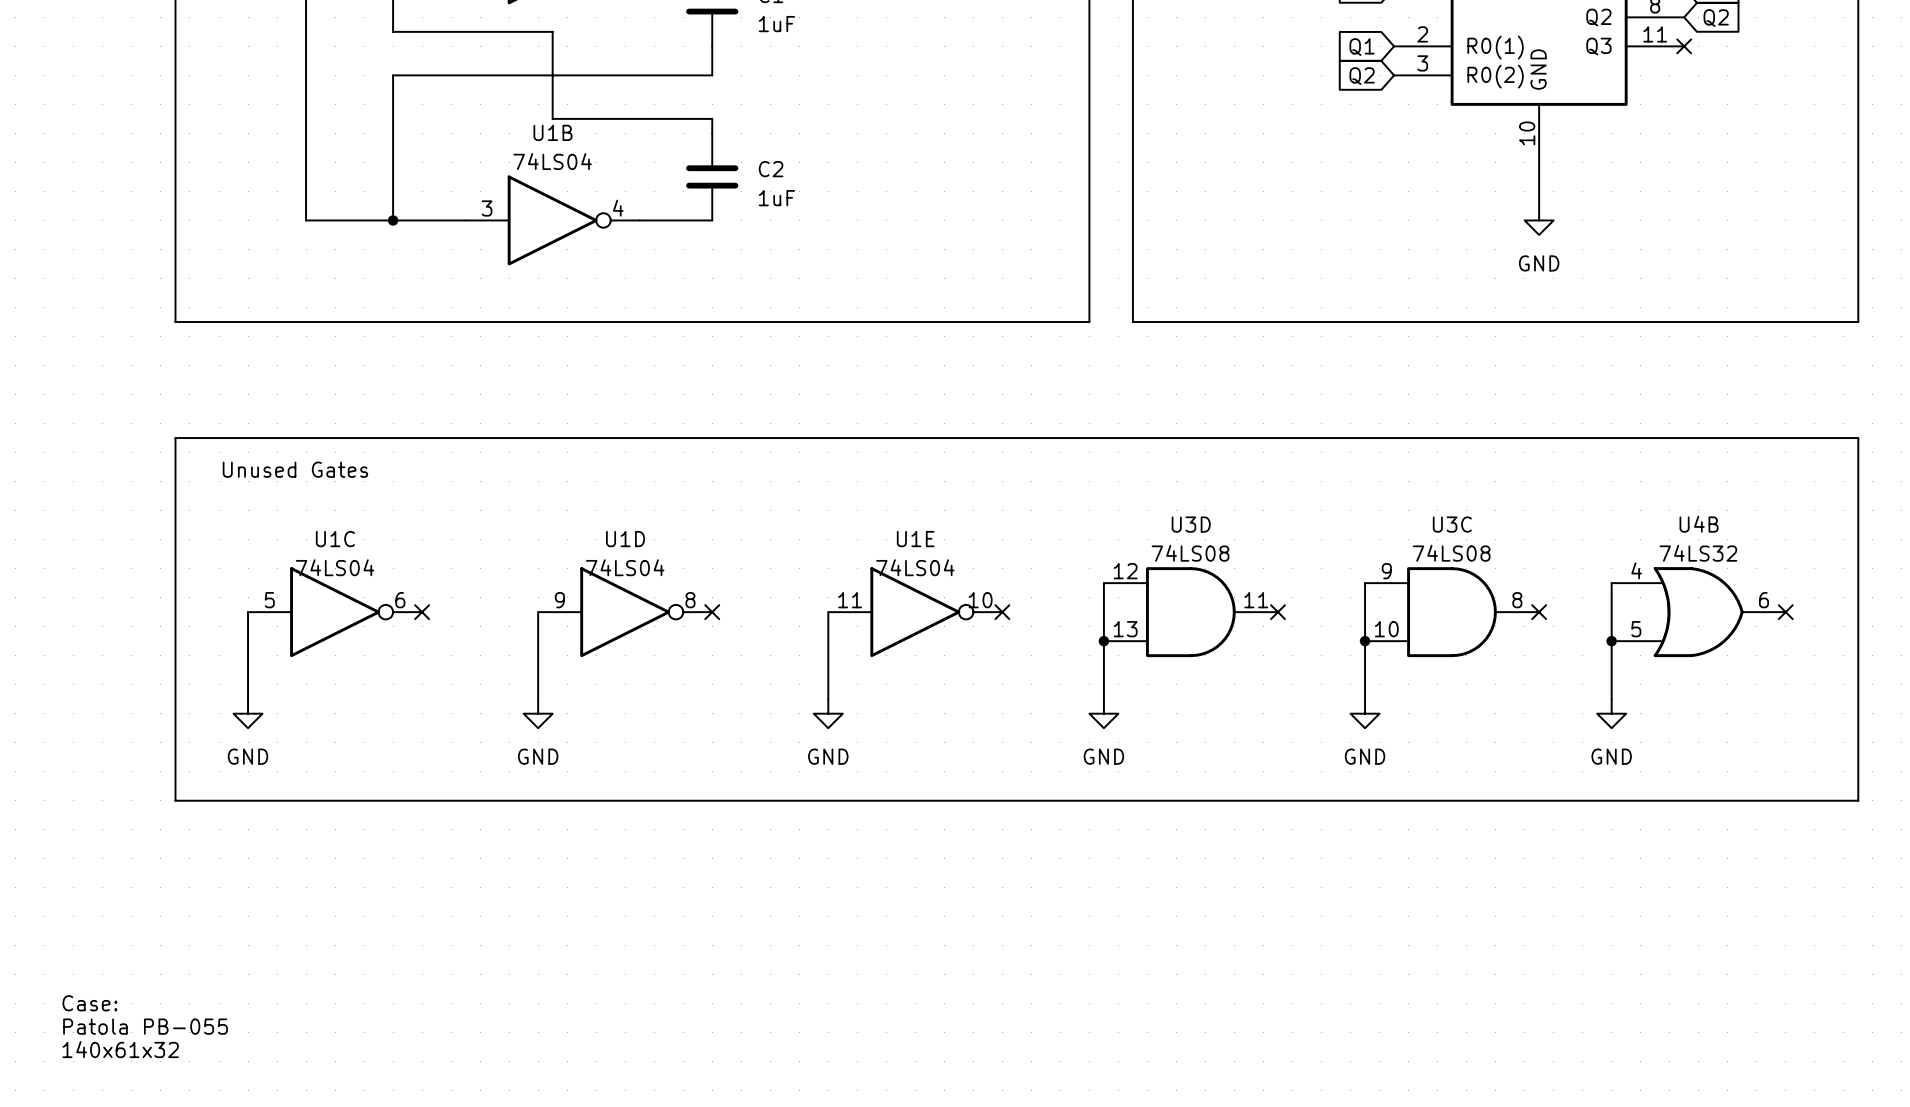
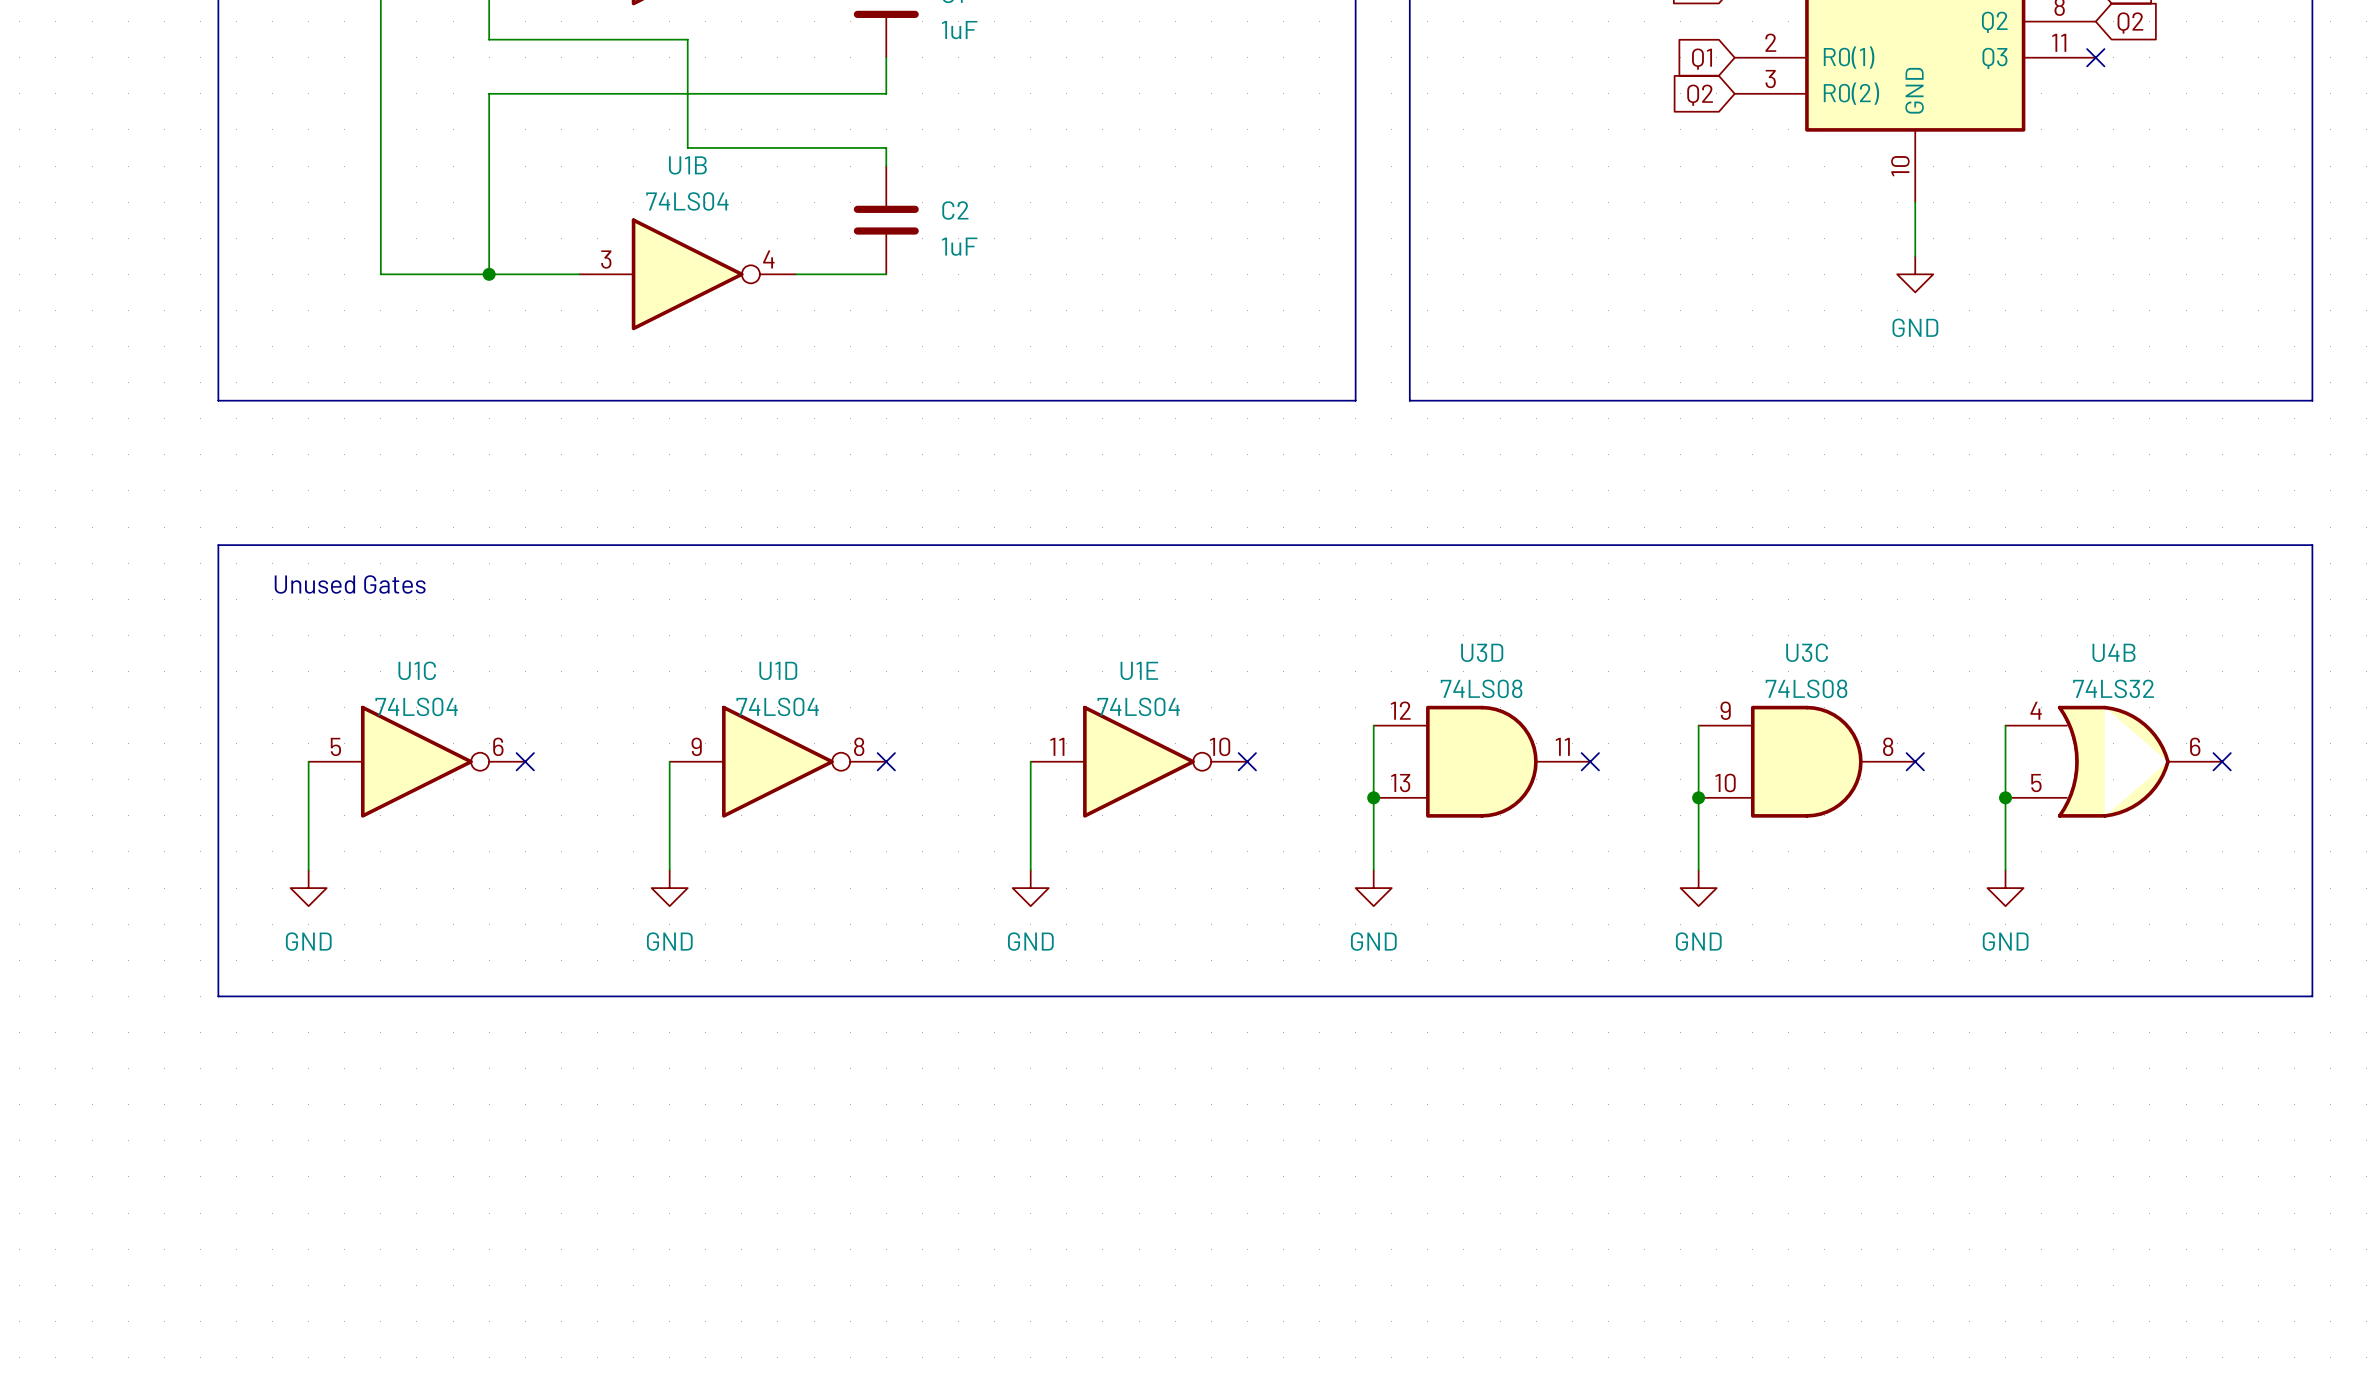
text: Case: (89, 1003) -> none
text: Patola PB-055 (145, 1026) -> none
text: 140x61x32 (120, 1049) -> none

